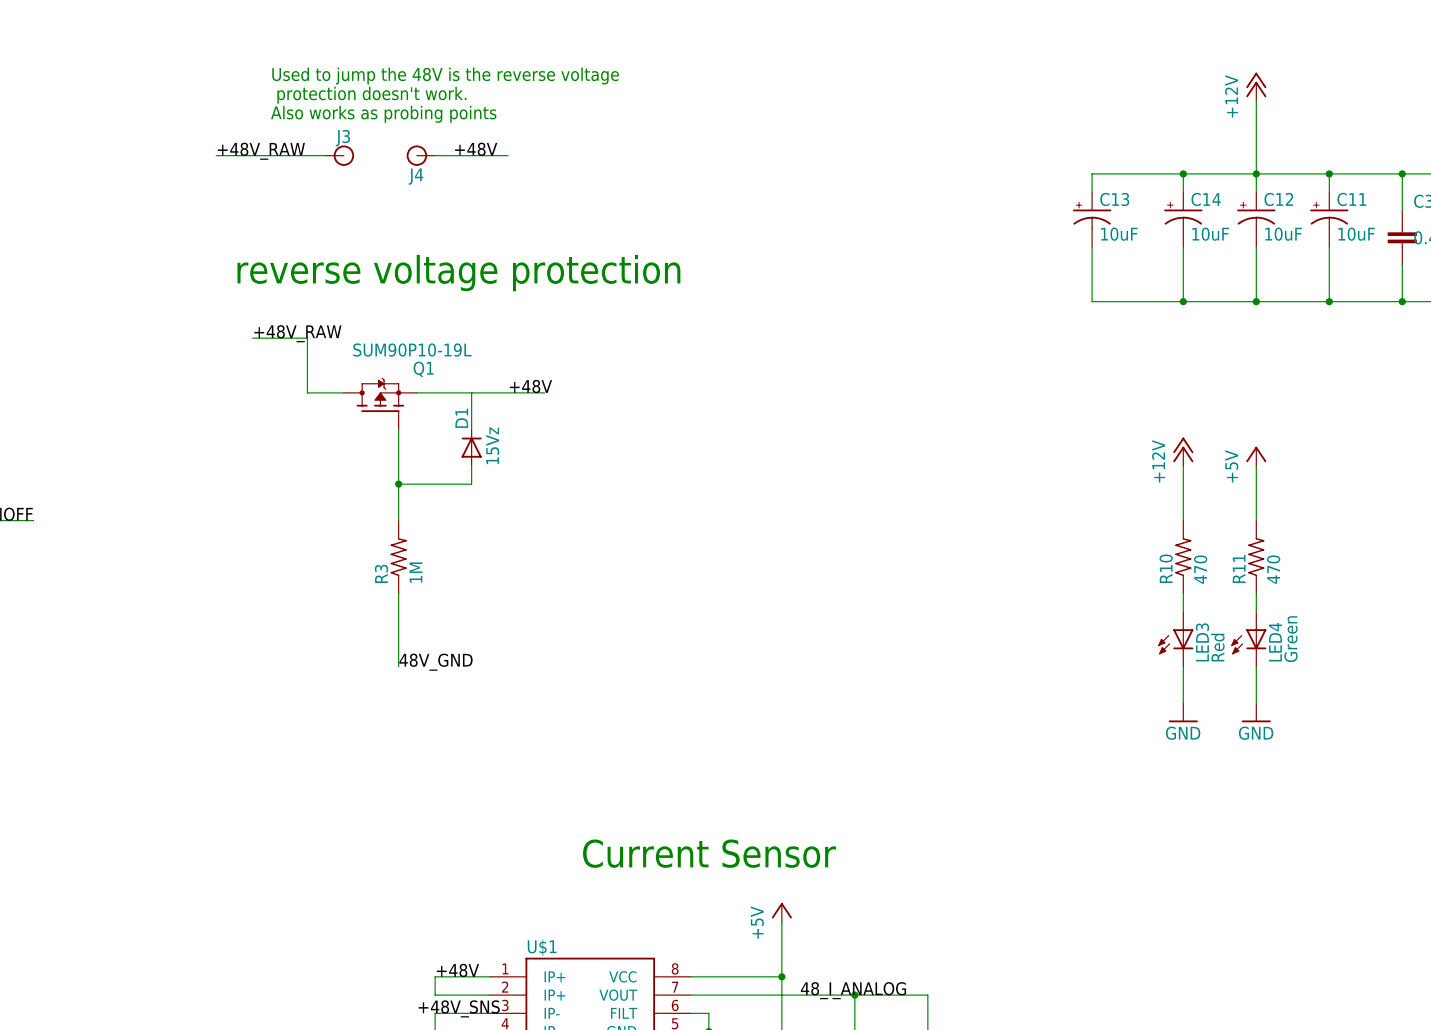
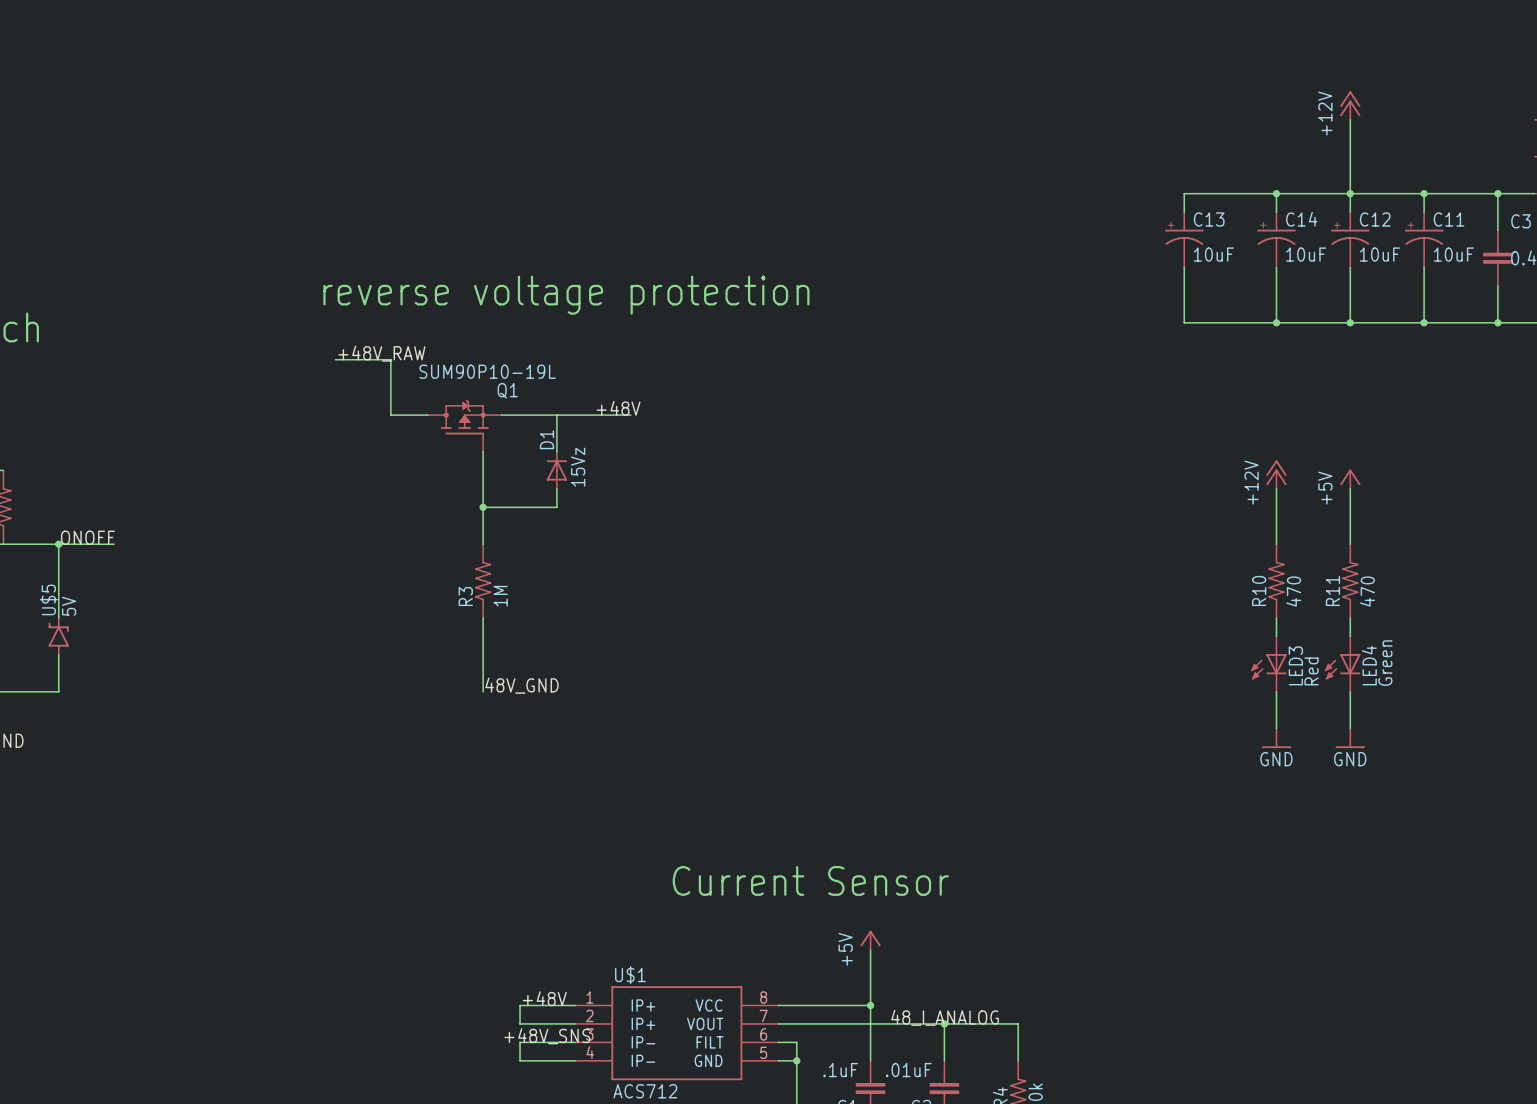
text: Used to jump the 48V is the reverse voltage (445, 76) -> none
text: protection doesn't work. (371, 95) -> none
text: Also works as probing points (383, 114) -> none
label: +48V (476, 149) -> none
label: +48V_RAW (261, 151) -> none
wire: (216, 155) (325, 155) -> none
J3: (339, 155) -> none
J4: (420, 155) -> none
wire: (435, 155) (508, 155) -> none

